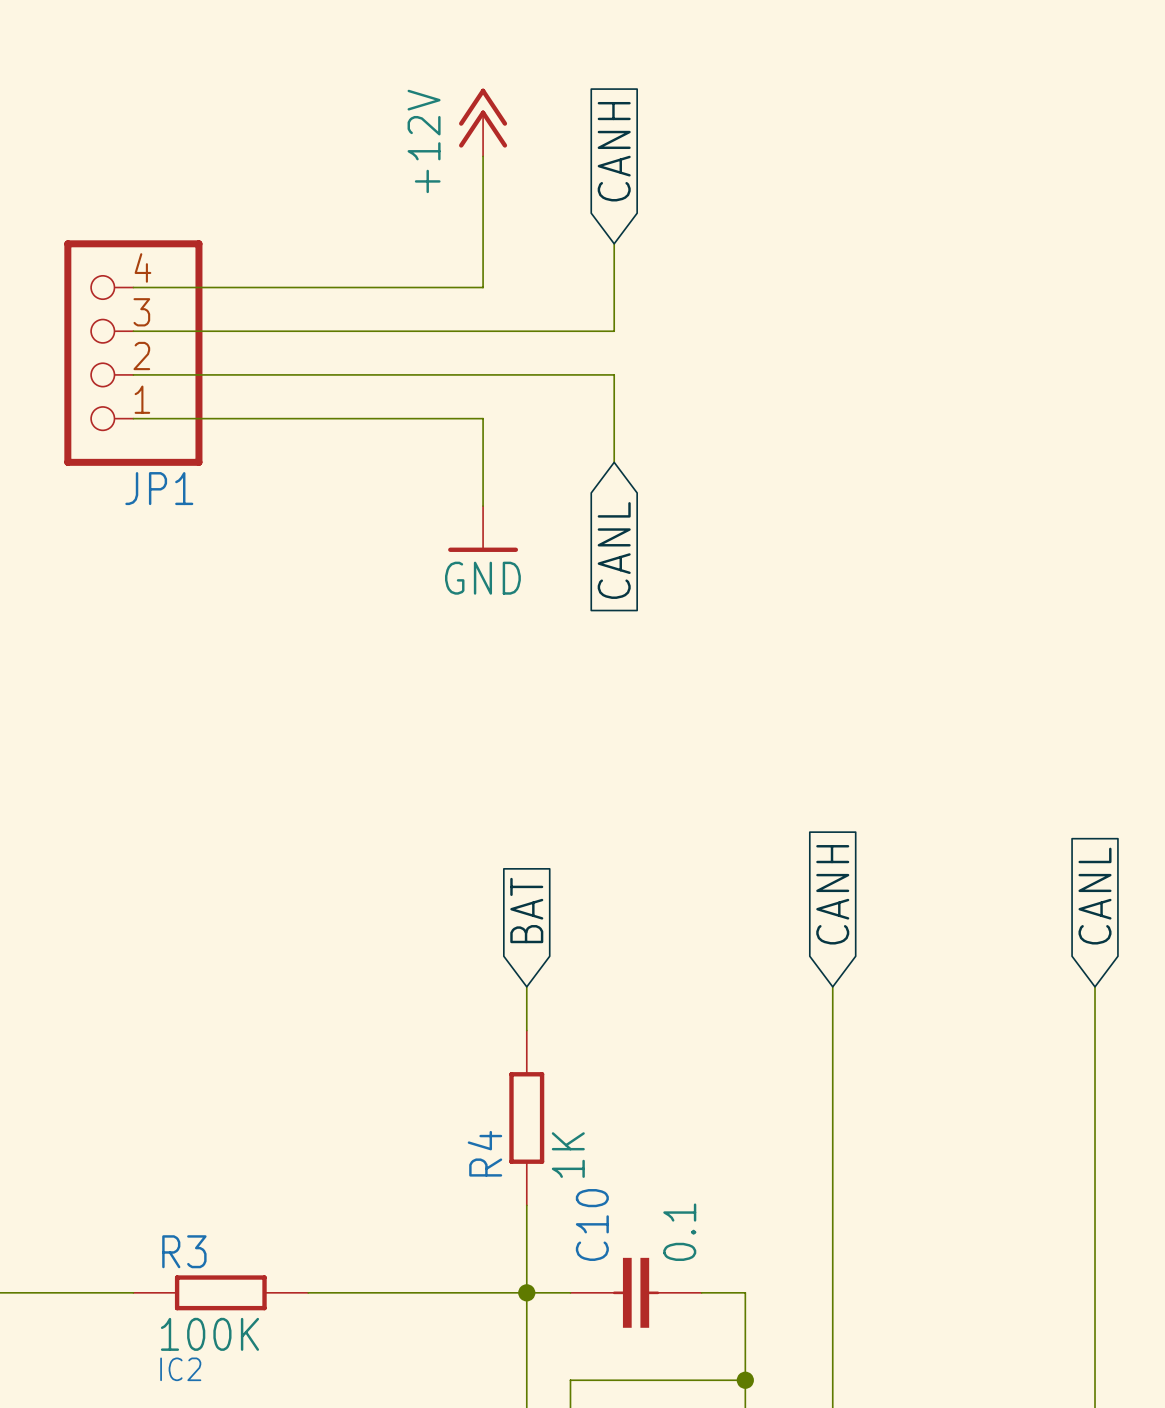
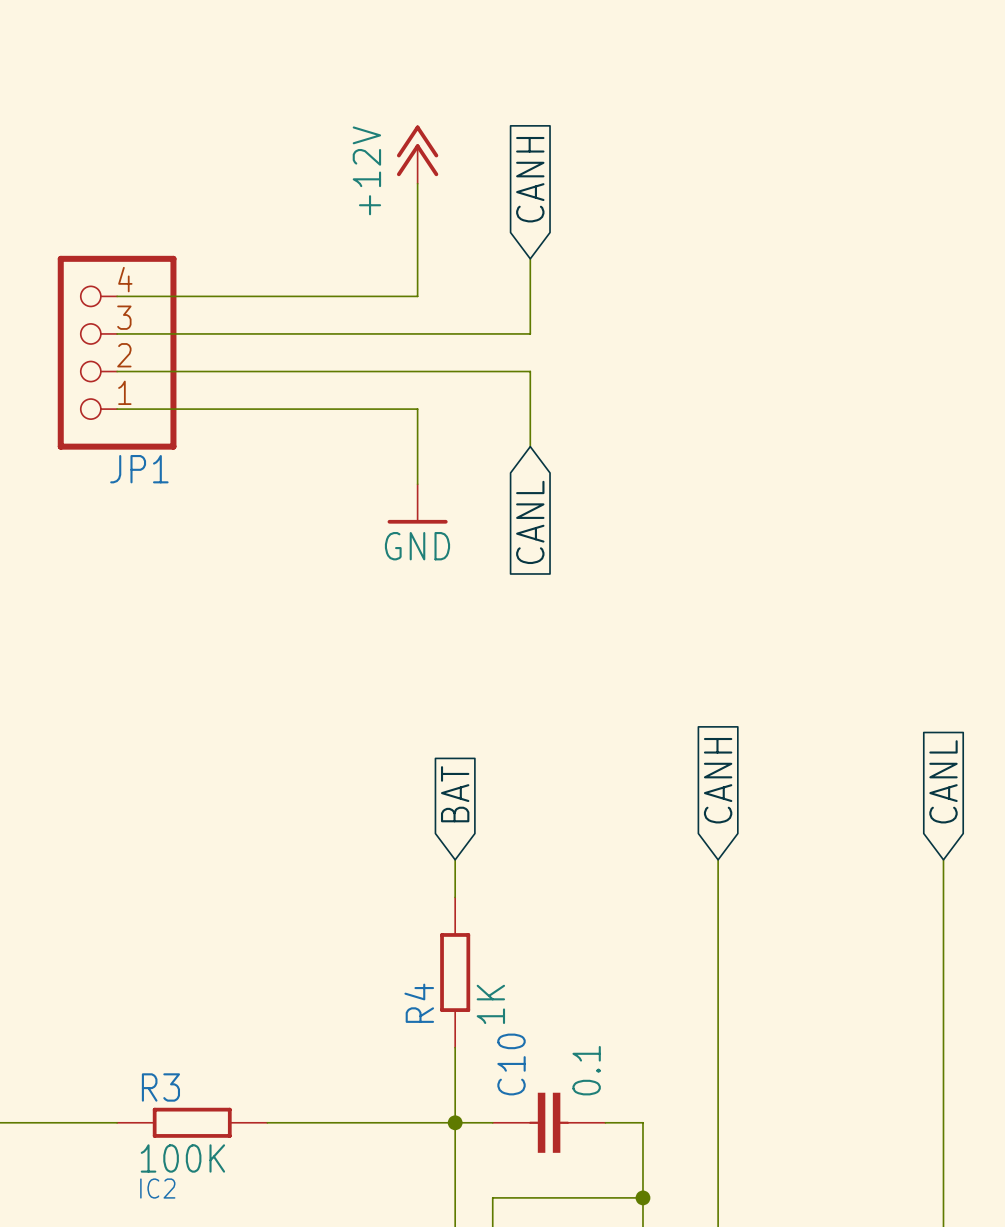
power symbol position: +12V (483, 122) -> +12V (417, 154)
global label position: CANH (614, 151) -> CANH (530, 179)
wire: (614, 243) (614, 287) -> (530, 409) (530, 446)
wire: (133, 287) (483, 287) -> (117, 409) (417, 409)
wire: (483, 331) (614, 331) -> (417, 296) (417, 258)
JP1 position: (133, 353) -> (117, 352)
wire: (614, 374) (614, 418) -> (530, 333) (530, 296)
wire: (483, 418) (483, 462) -> (417, 371) (530, 371)
power symbol position: GND (483, 529) -> GND (417, 503)
global label position: CANL (614, 550) -> CANL (530, 522)

